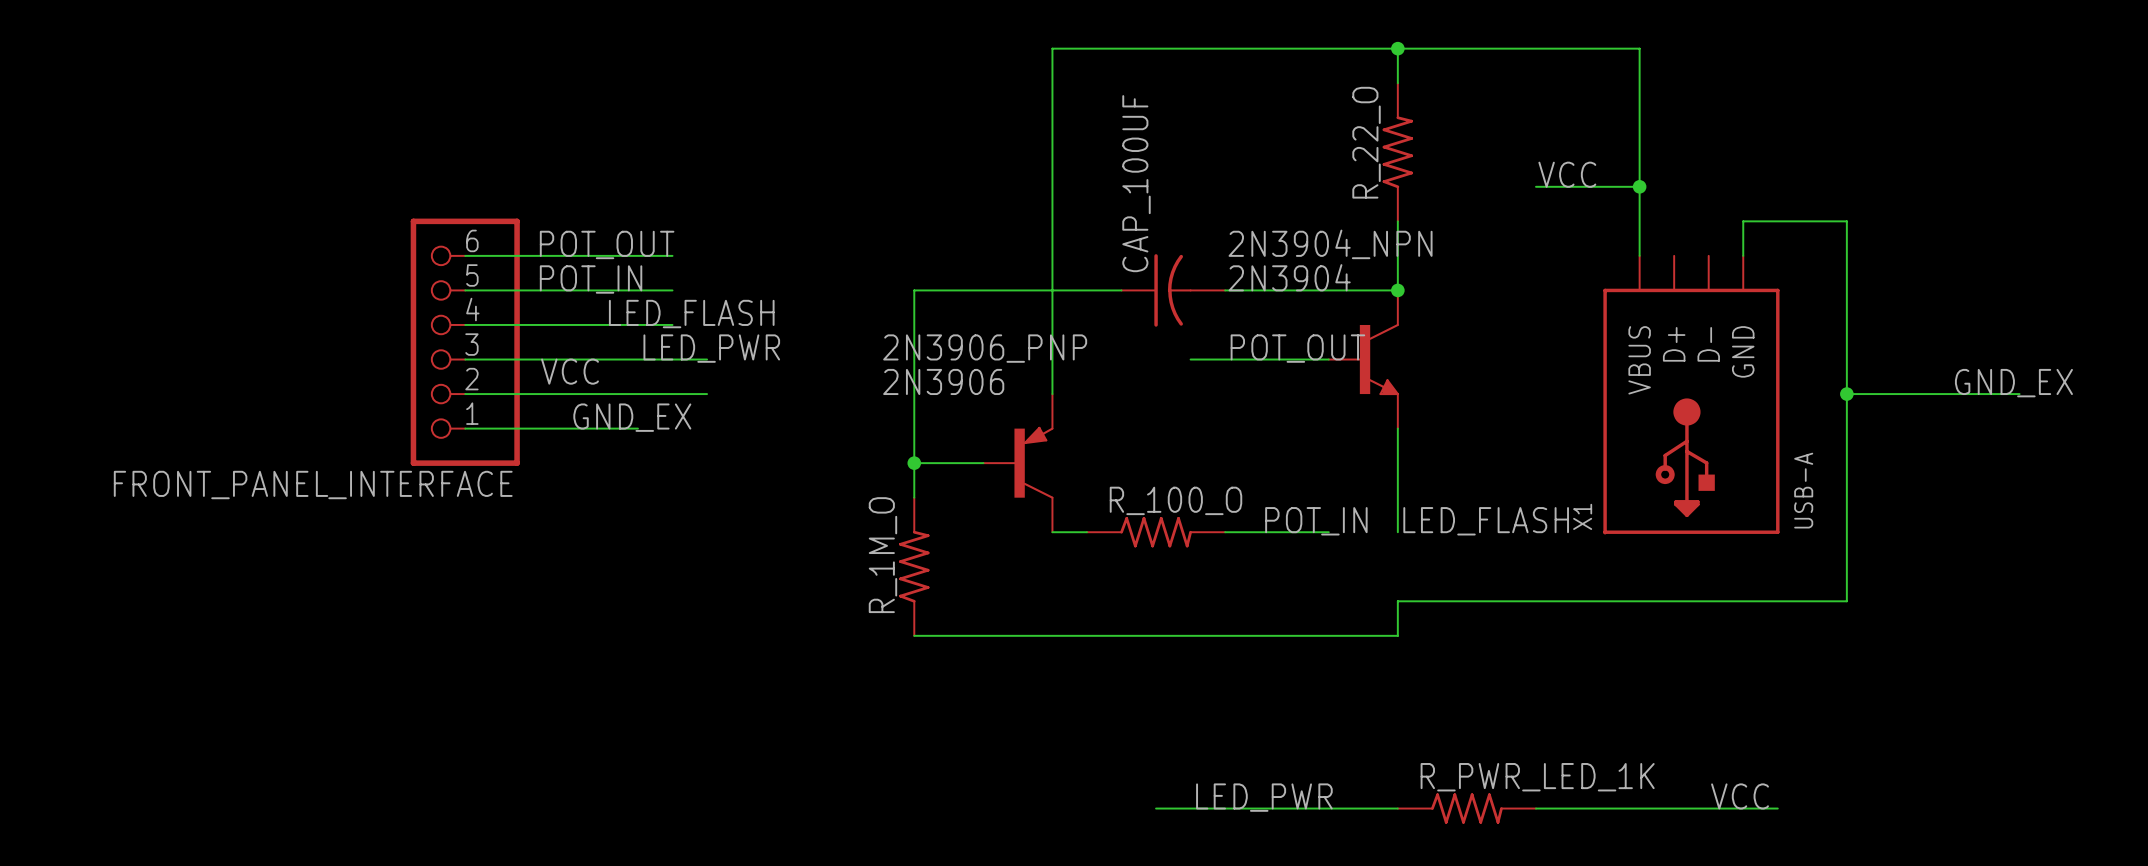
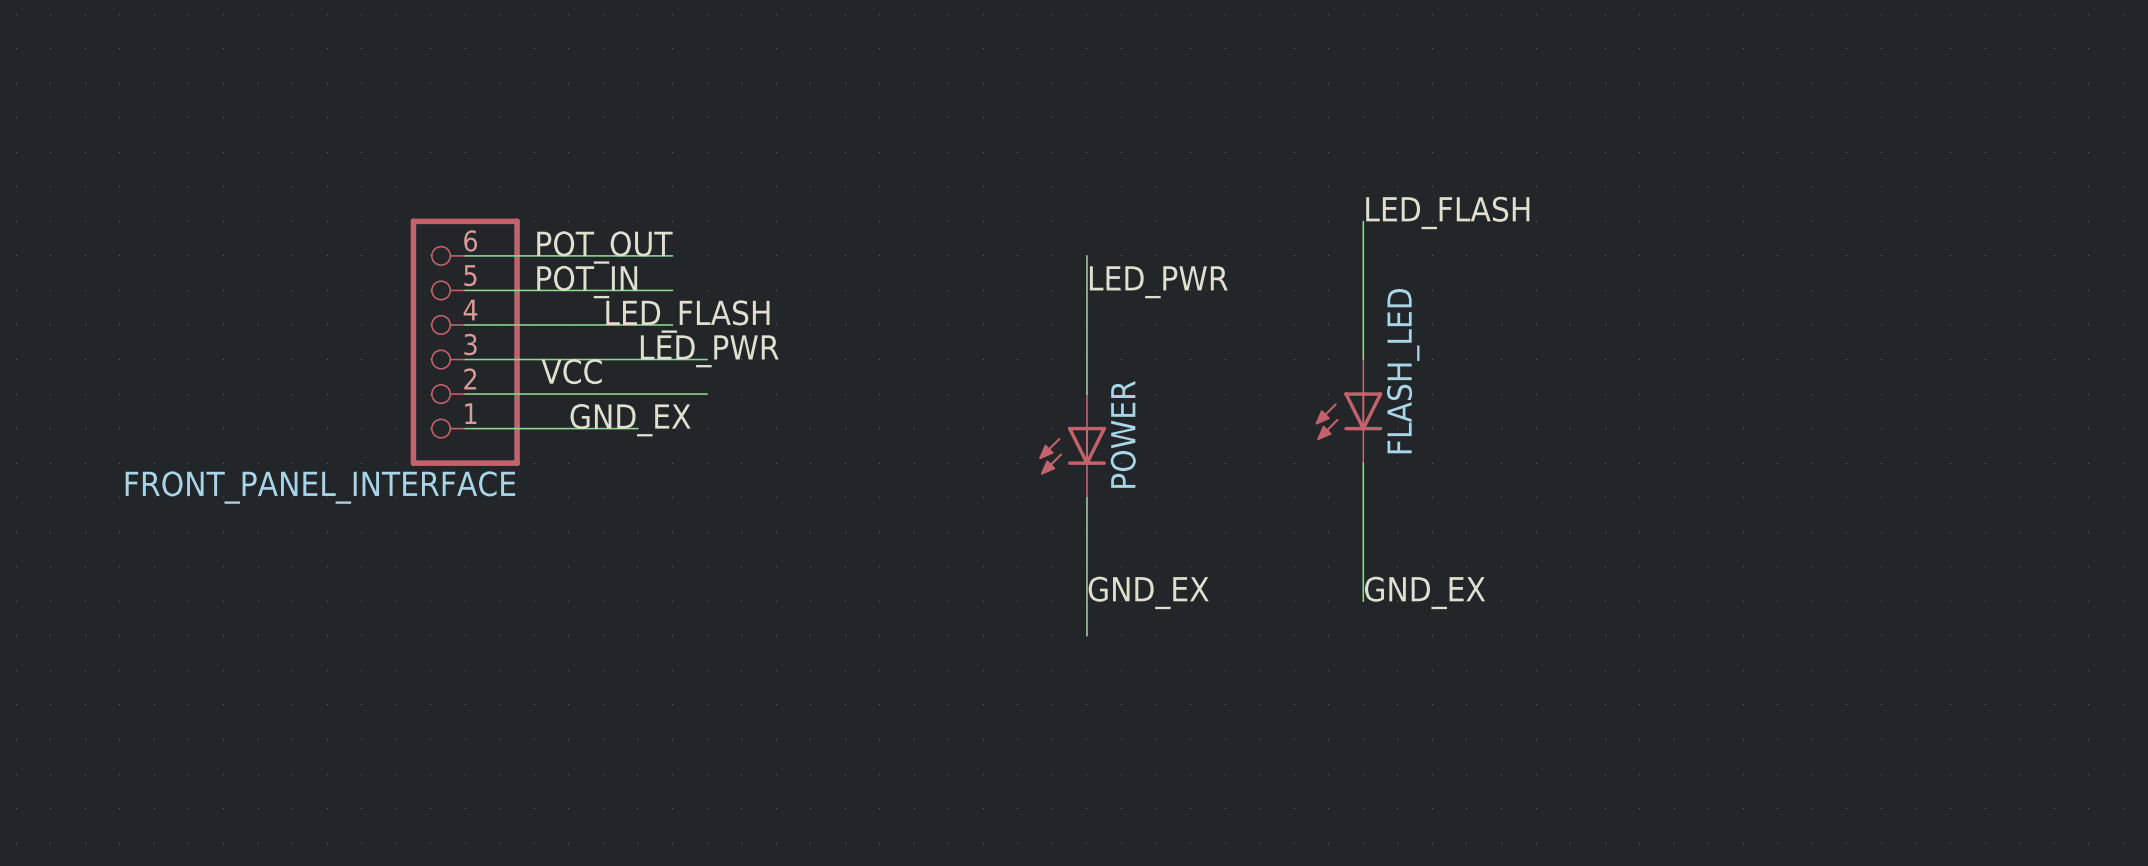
wire: (1397, 48) (1397, 83) -> none
junction: (1397, 48) -> none
R_22_O: (1397, 152) -> none
label: VCC (1567, 174) -> none
wire: (1536, 186) (1639, 186) -> none
junction: (1639, 186) -> none
wire: none -> (1363, 221) (1363, 359)
wire: (1397, 221) (1397, 290) (1225, 290) -> none
wire: none -> (1086, 255) (1086, 394)
wire: (1639, 255) (1639, 48) (1052, 48) (1052, 394) -> none
wire: (1743, 255) (1743, 221) (1846, 221) (1846, 601) (1397, 601) (1397, 635) (914, 635) -> none
label: none -> LED_PWR (1158, 282)
wire: (1121, 290) (914, 290) (914, 497) -> none
CAP_100UF: (1173, 290) -> none
junction: (1397, 290) -> none
label: POT_OUT (1297, 348) -> none
wire: (1190, 359) (1328, 359) -> none
2N3904_NPN: 2N3904 (1363, 359) -> none
label: GND_EX (2013, 383) -> none
wire: (1846, 394) (2019, 394) -> none
junction: (1846, 394) -> none
X1: USB-A (1691, 395) -> none
FLASH_LED: none -> (1348, 411)
wire: (1397, 428) (1397, 532) -> none
POWER: none -> (1072, 445)
wire: (914, 463) (983, 463) -> none
junction: (914, 463) -> none
2N3906_PNP: 2N3906 (1018, 463) -> none
wire: none -> (1363, 463) (1363, 601)
wire: none -> (1086, 497) (1086, 635)
label: POT_IN (1316, 521) -> none
label position: LED_FLASH (1486, 521) -> LED_FLASH (1447, 212)
wire: (1052, 532) (1086, 532) -> none
R_100_O: (1156, 532) -> none
wire: (1225, 532) (1328, 532) -> none
R_1M_O: (914, 566) -> none
label: none -> GND_EX (1148, 592)
label: none -> GND_EX (1425, 592)
label: VCC (1740, 796) -> none
label: LED_PWR (1264, 797) -> none
wire: (1156, 808) (1397, 808) -> none
R_PWR_LED_1K: (1466, 808) -> none
wire: (1536, 808) (1777, 808) -> none

